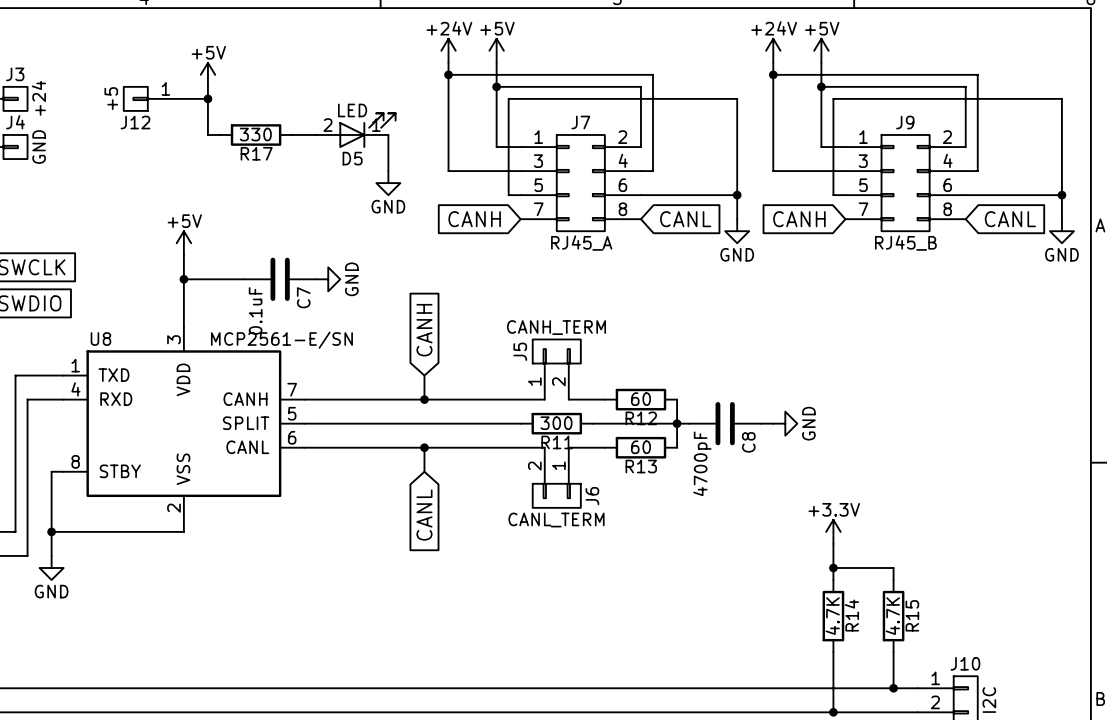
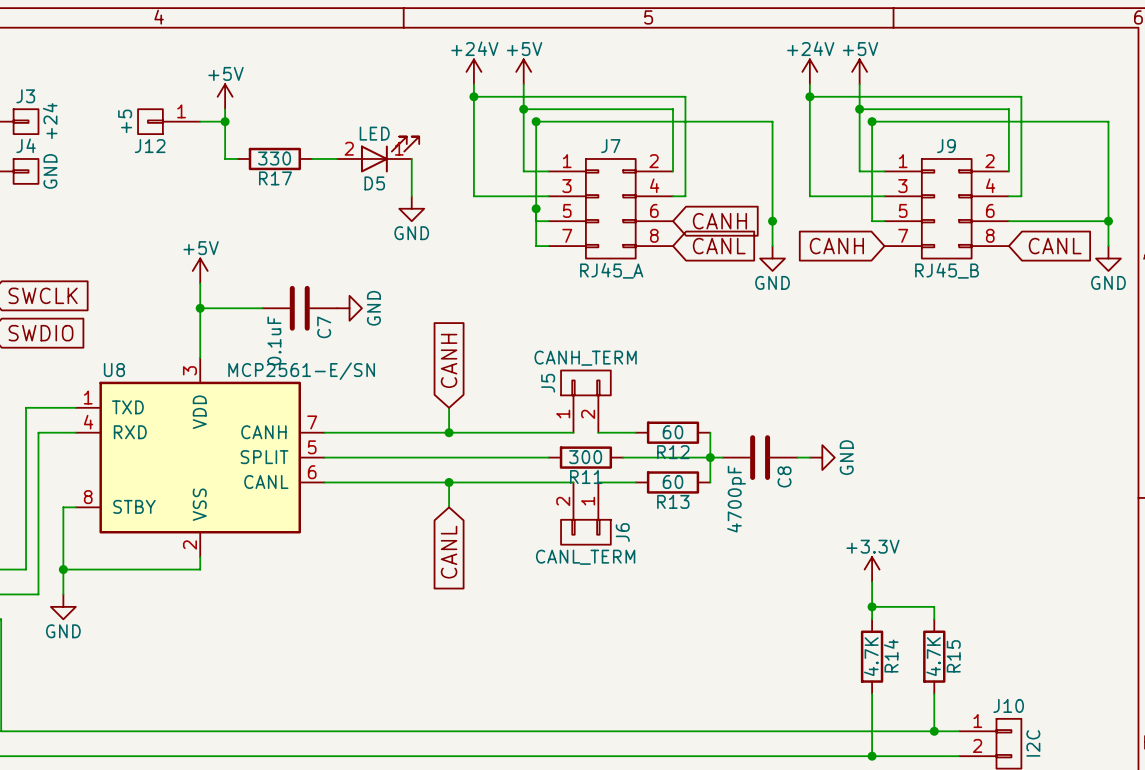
junction: none -> (536, 121)
junction: none -> (872, 121)
junction: none -> (536, 208)
wire: none -> (536, 221) (536, 246) (548, 246)
wire: (640, 195) (737, 195) -> none
global label rotation: 0° (474, 219) -> 180° (719, 221)
global label position: CANH (474, 219) -> CANH (719, 221)

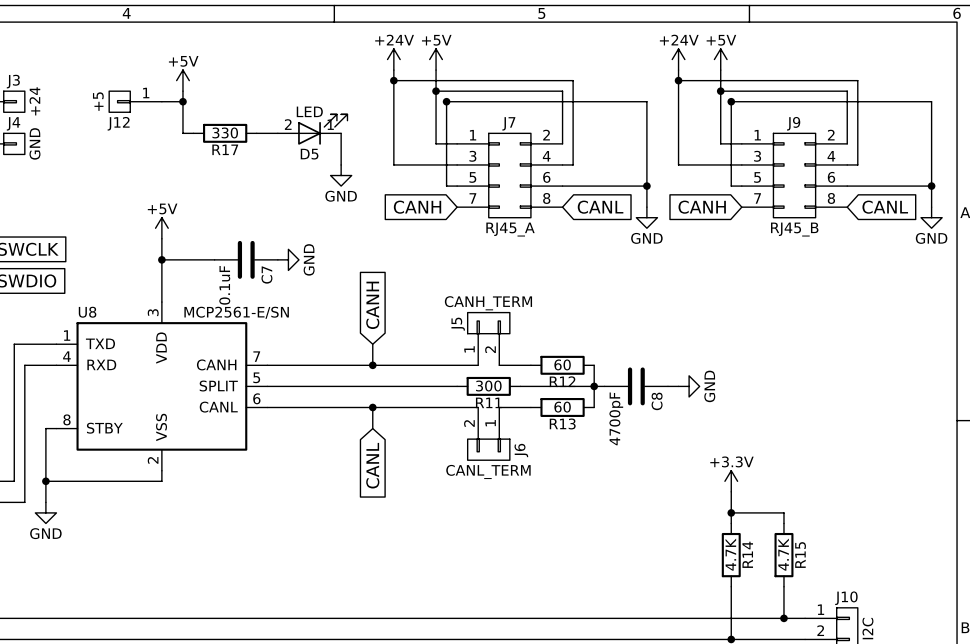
junction: (536, 208) -> none
wire: (536, 221) (536, 246) (548, 246) -> none
wire: none -> (562, 186) (646, 186)
global label rotation: 0° (719, 221) -> 180° (417, 207)
global label position: CANH (719, 221) -> CANH (417, 207)

